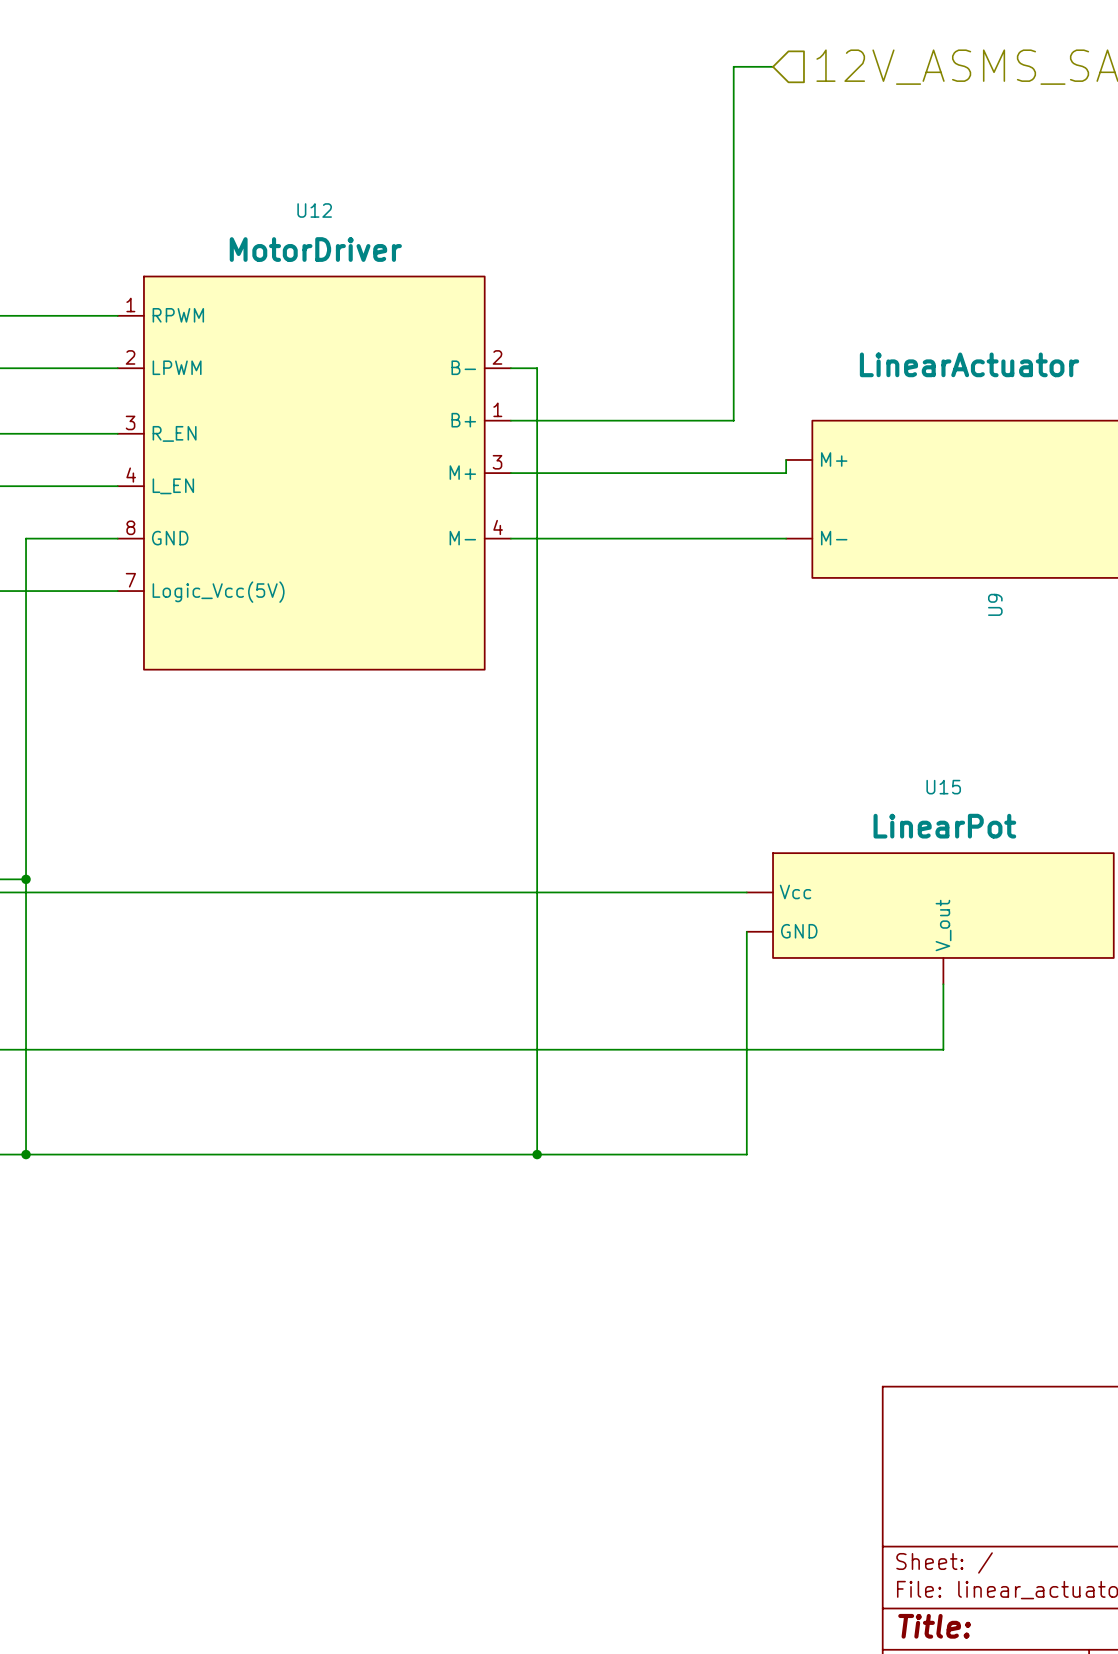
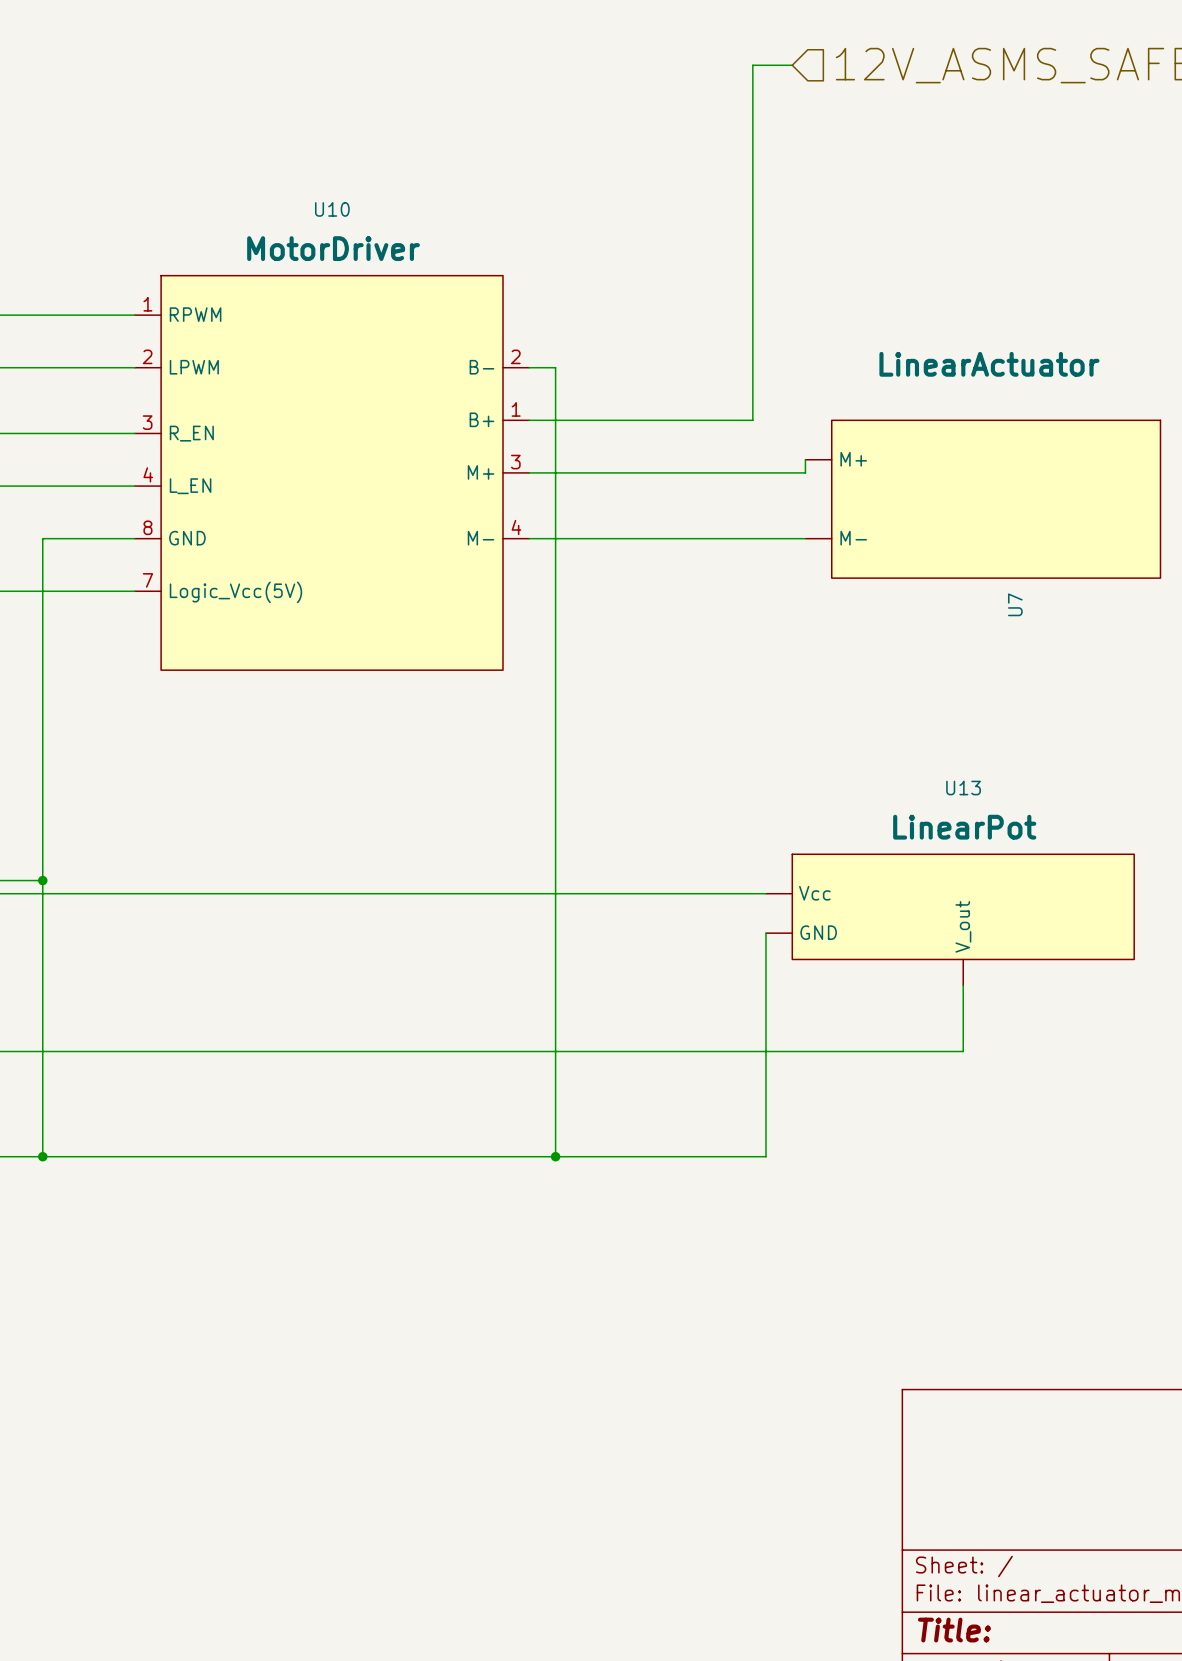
U12 name: U12 (314, 210) -> U10 (332, 209)
U9 name: U9 (995, 604) -> U7 (1015, 604)
U15 name: U15 (943, 787) -> U13 (963, 788)

